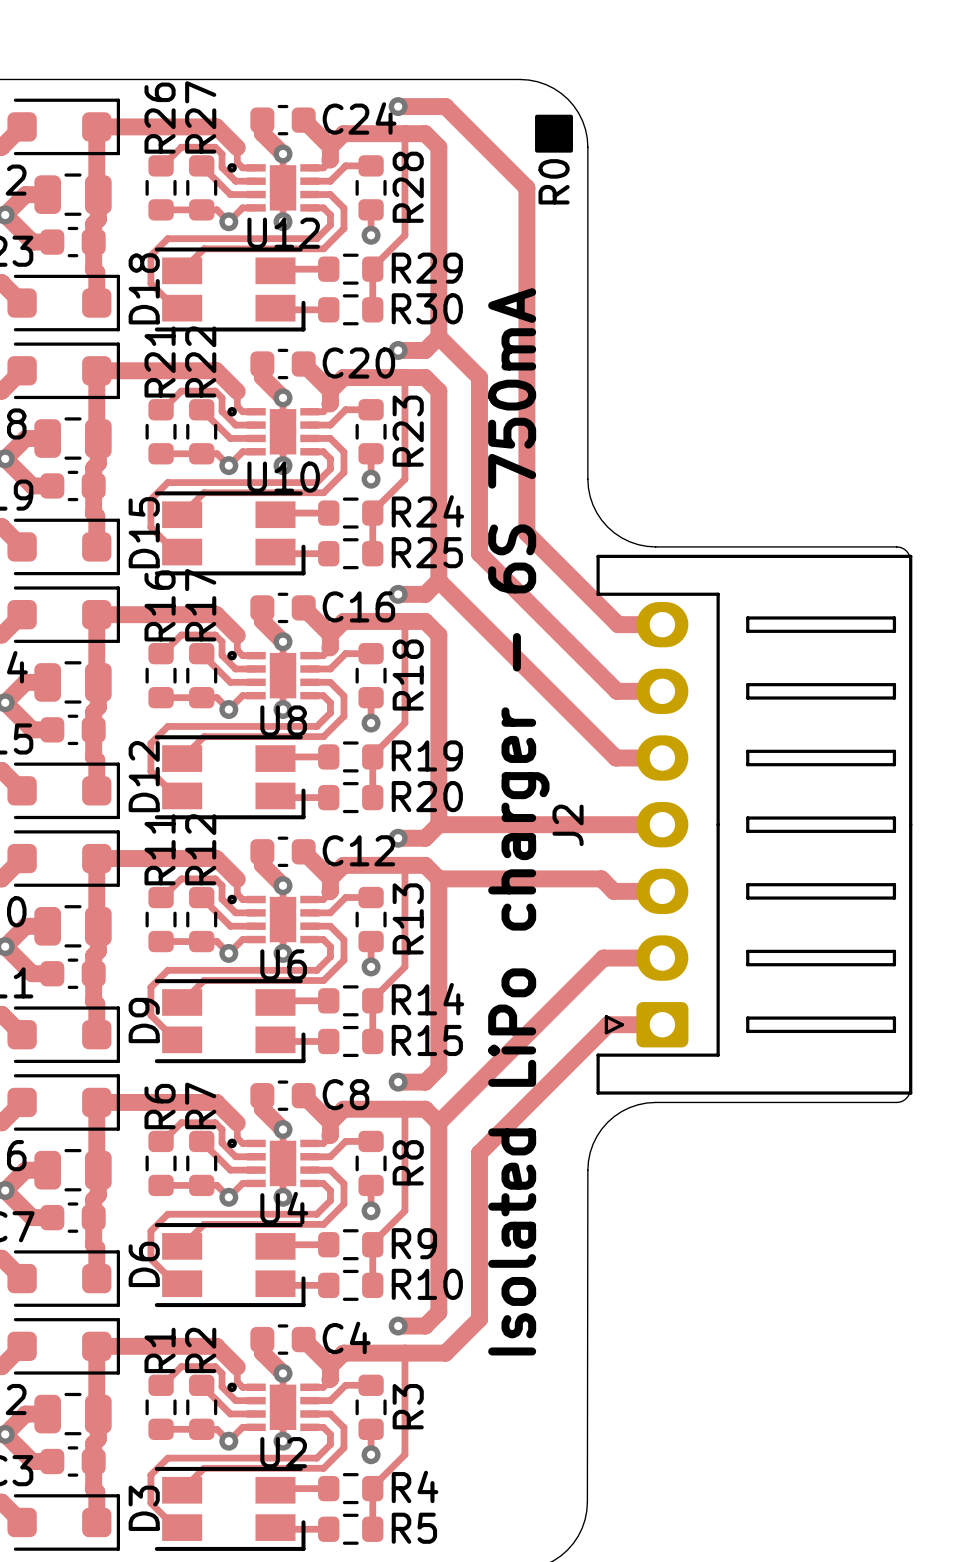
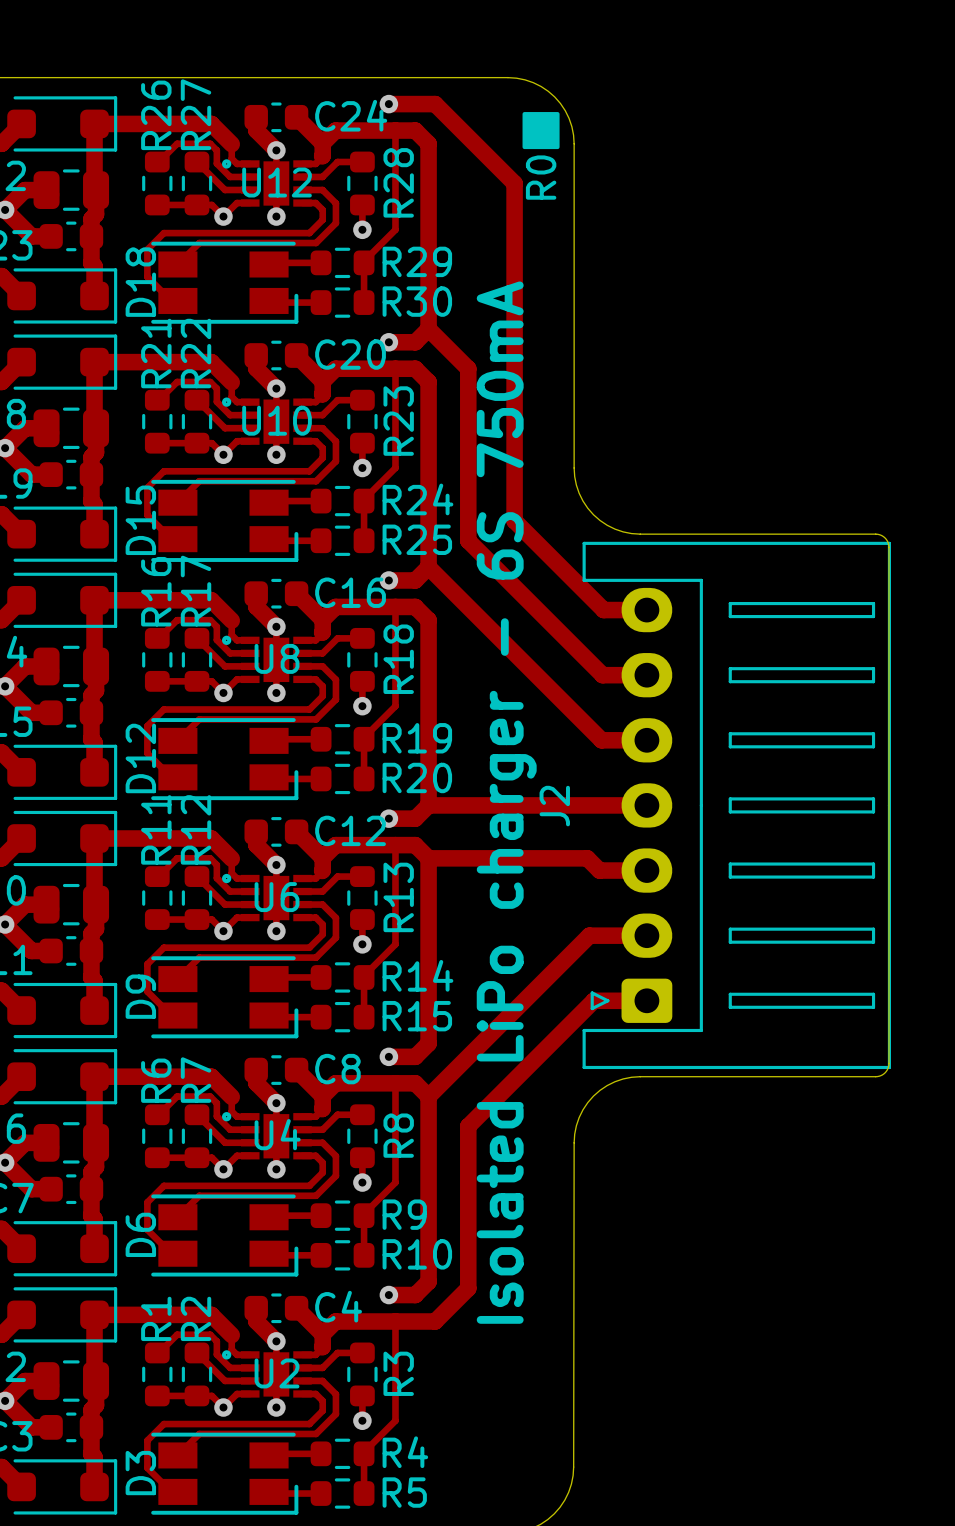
U12 name position: U12 (283, 233) -> U12 (277, 182)
U10 name position: U10 (283, 477) -> U10 (277, 420)
U8 name position: U8 (283, 720) -> U8 (277, 658)
U6 name position: U6 (283, 964) -> U6 (277, 897)
U4 name position: U4 (284, 1208) -> U4 (277, 1134)
U2 name position: U2 (283, 1452) -> U2 (277, 1373)

